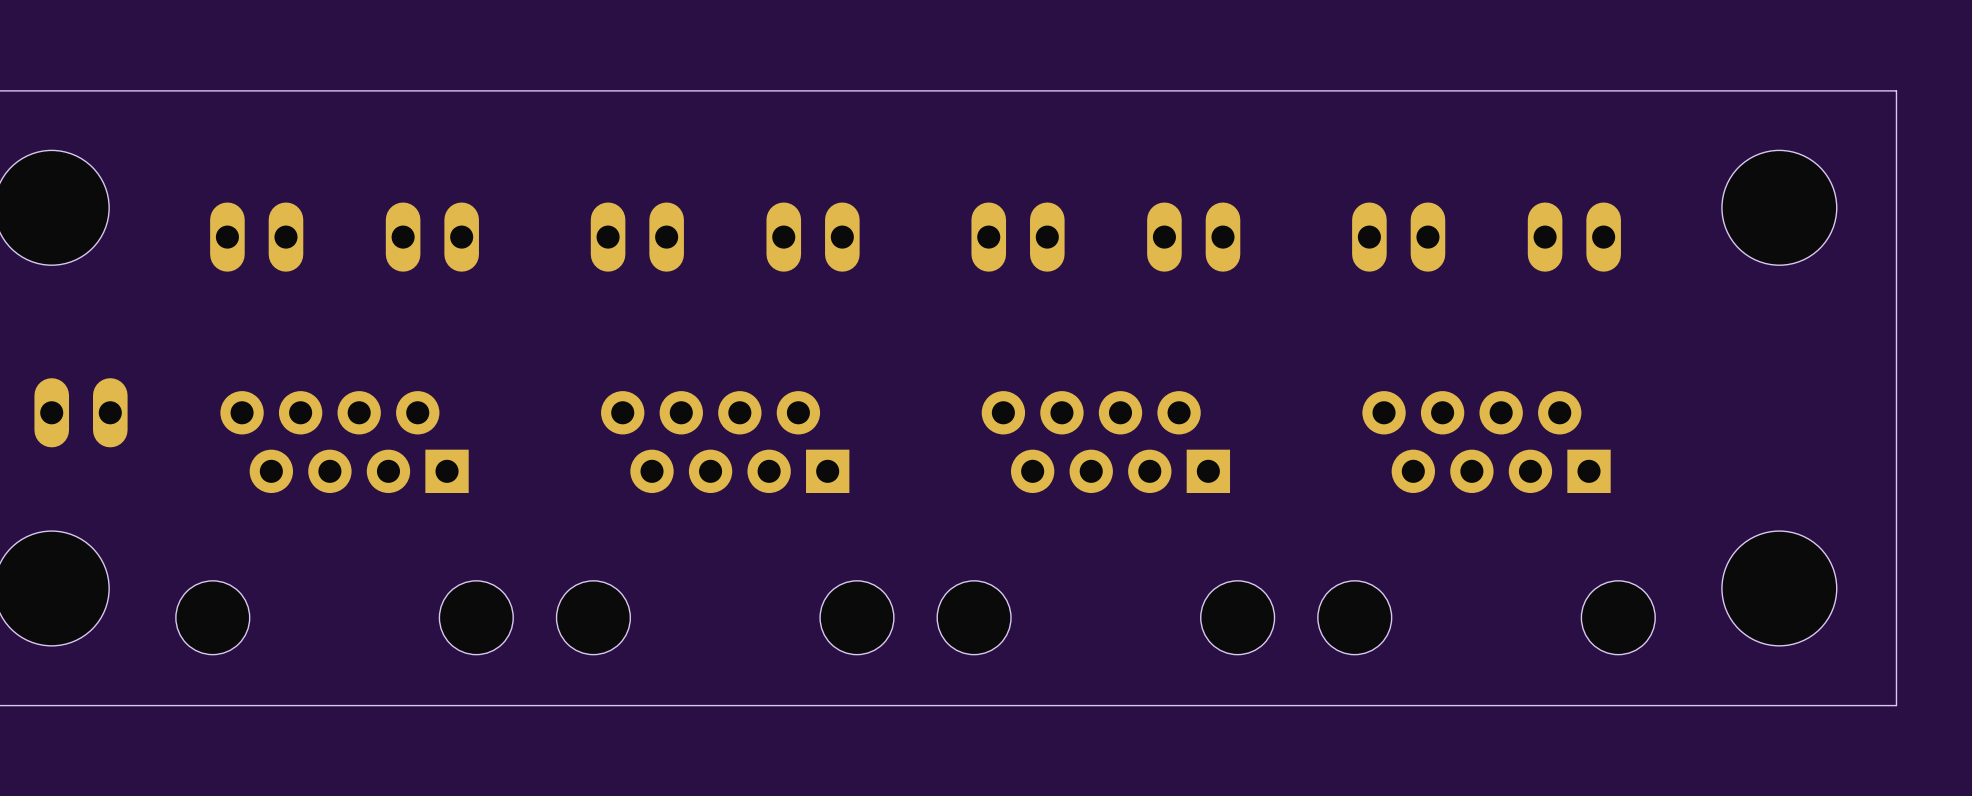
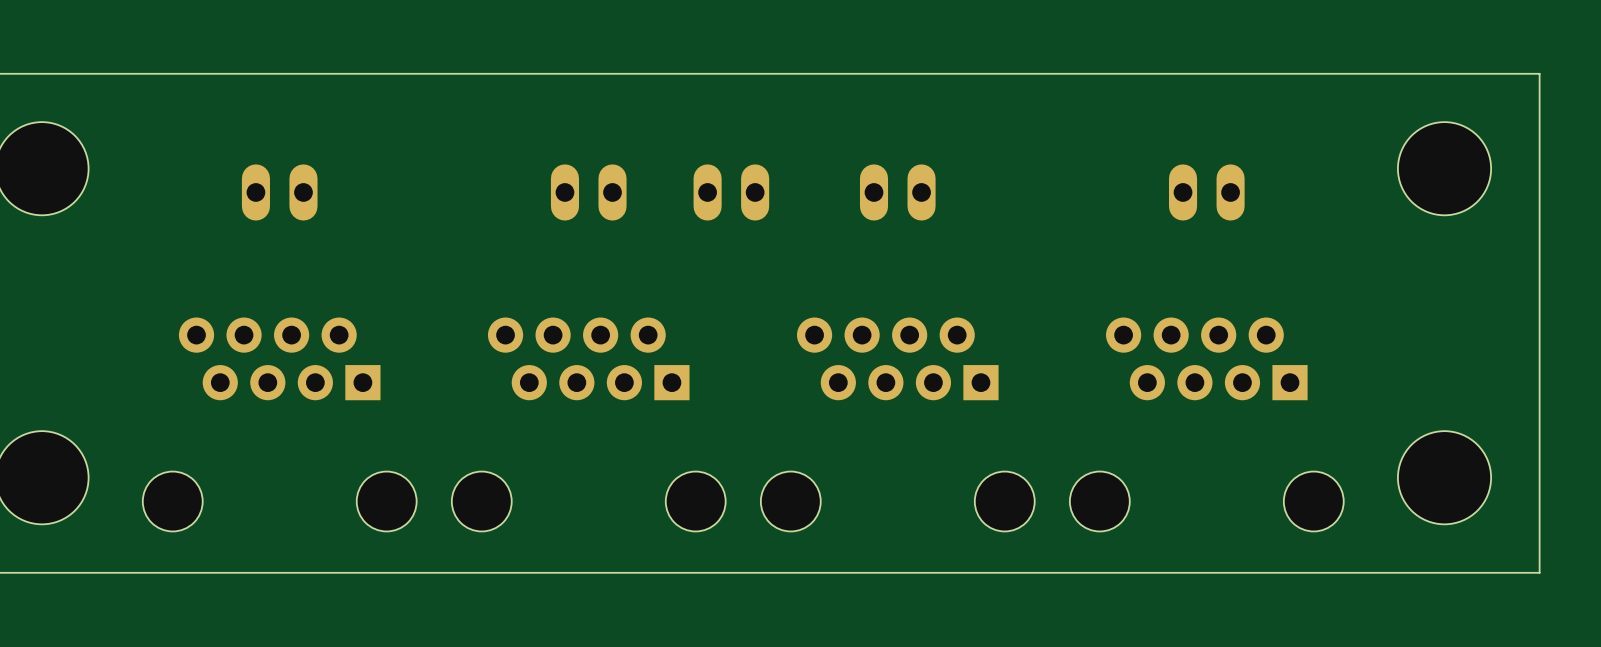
part: (256, 237) -> none
part: none -> (279, 192)
part: (432, 237) -> none
part: (637, 237) -> none
part: none -> (588, 192)
part: (813, 237) -> none
part: none -> (731, 192)
part: (1018, 237) -> none
part: none -> (897, 192)
part: (1193, 237) -> none
part: (1398, 237) -> none
part: none -> (1206, 192)
part: (1574, 237) -> none
part: (81, 412) -> none

